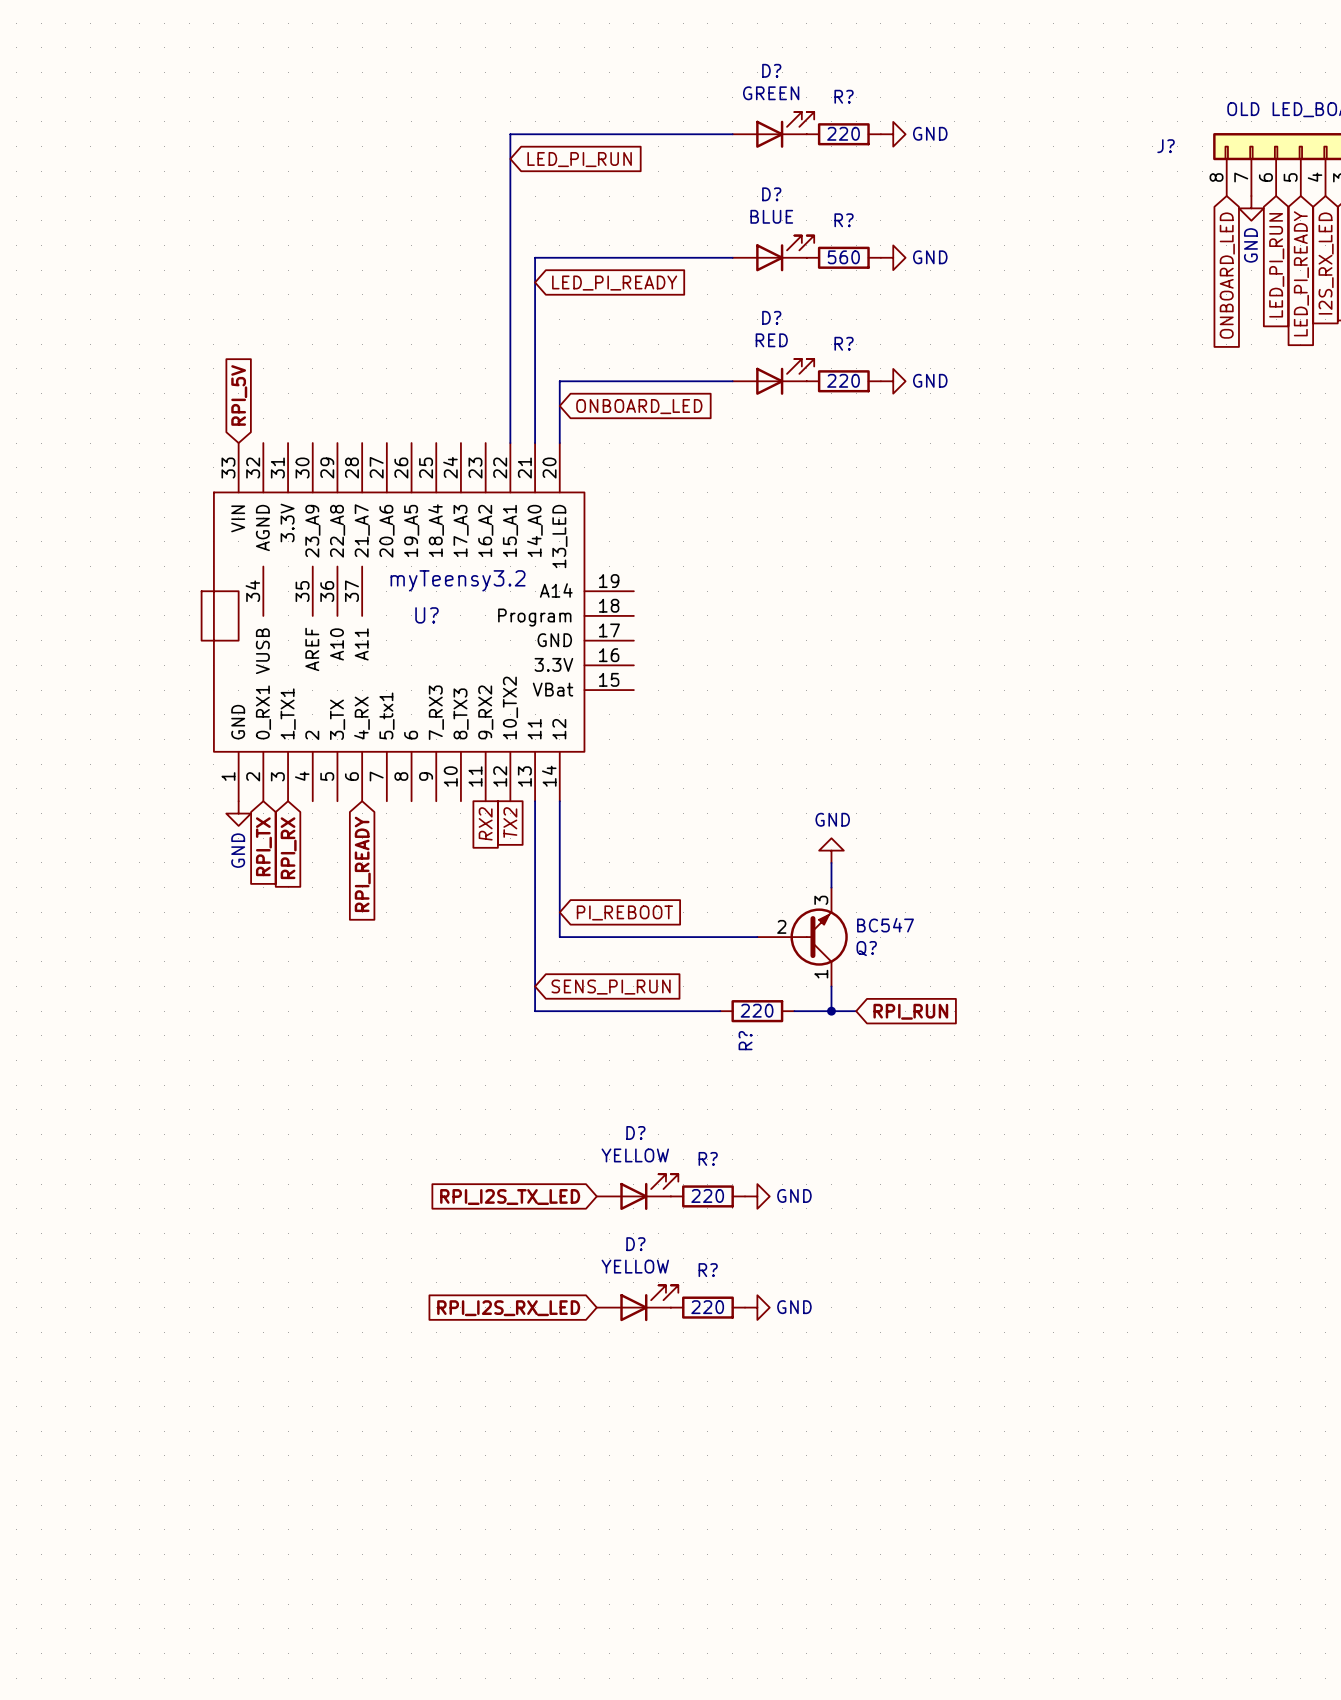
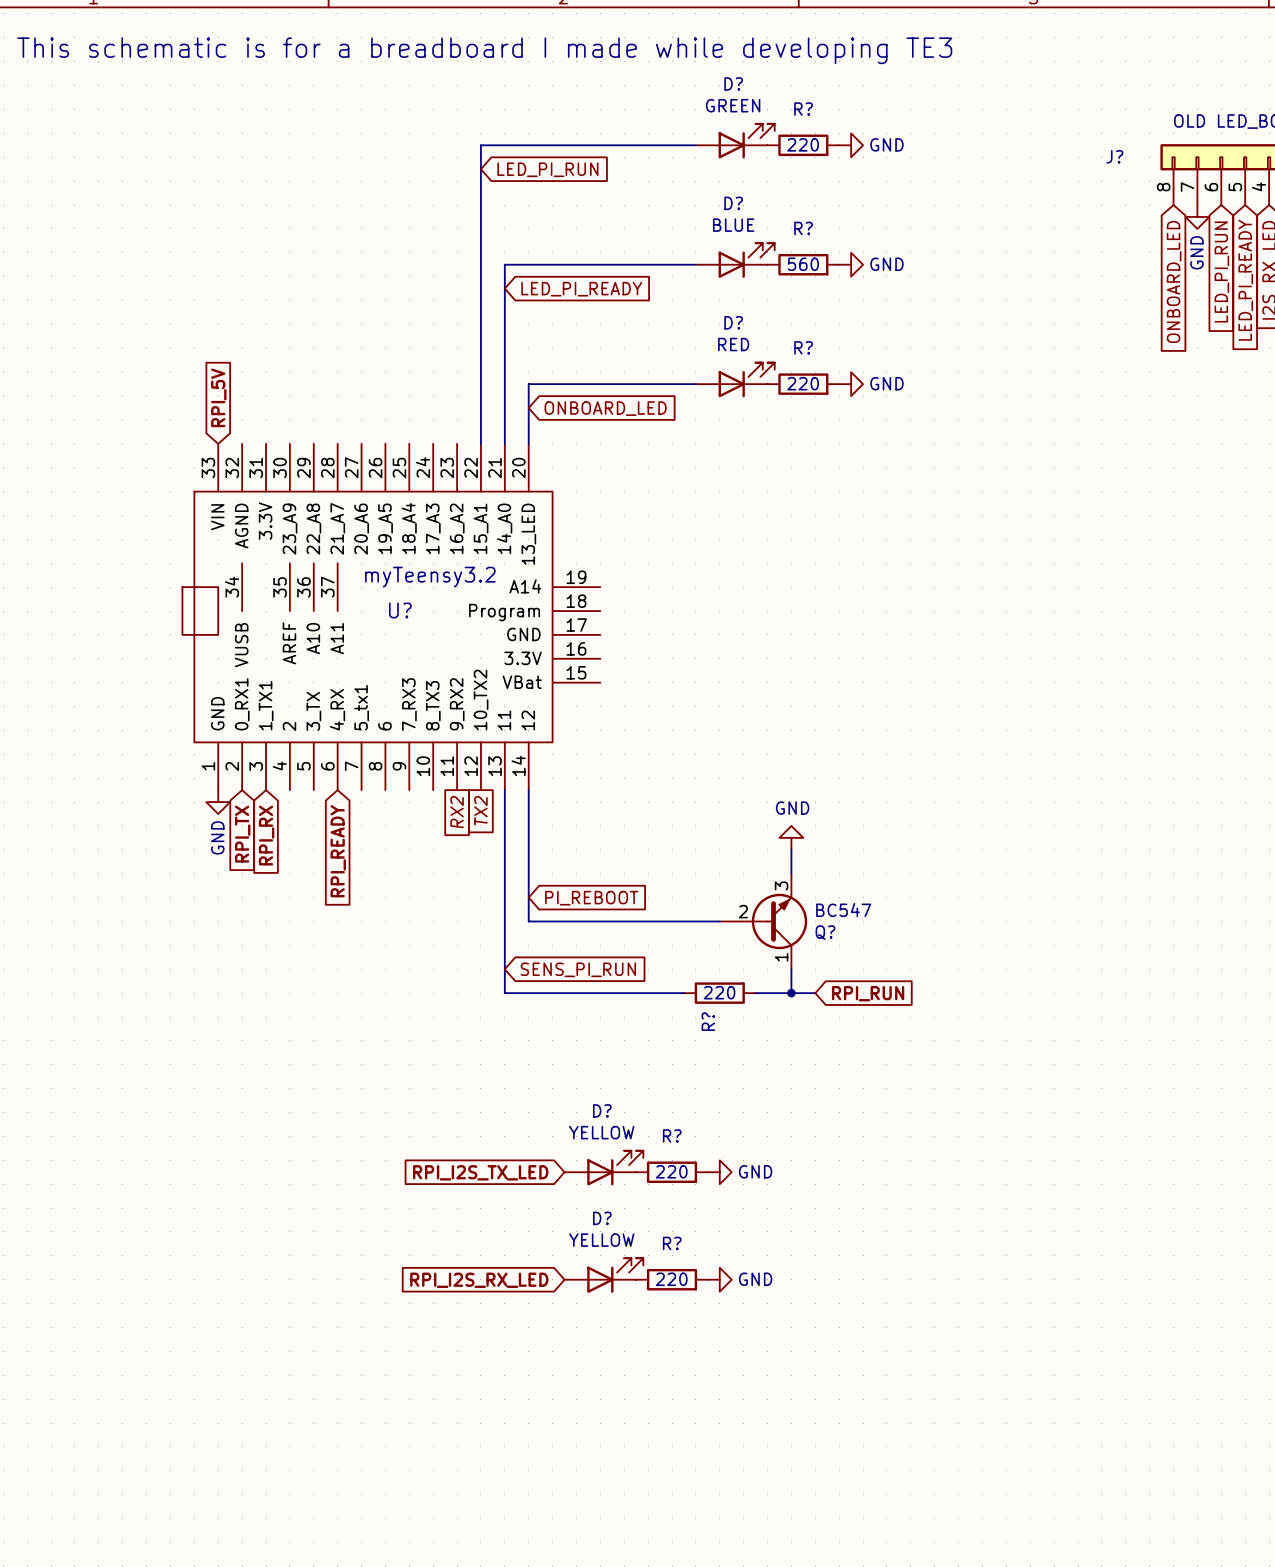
text: none -> This schematic is for a breadboard I made while developing TE3 (484, 50)

